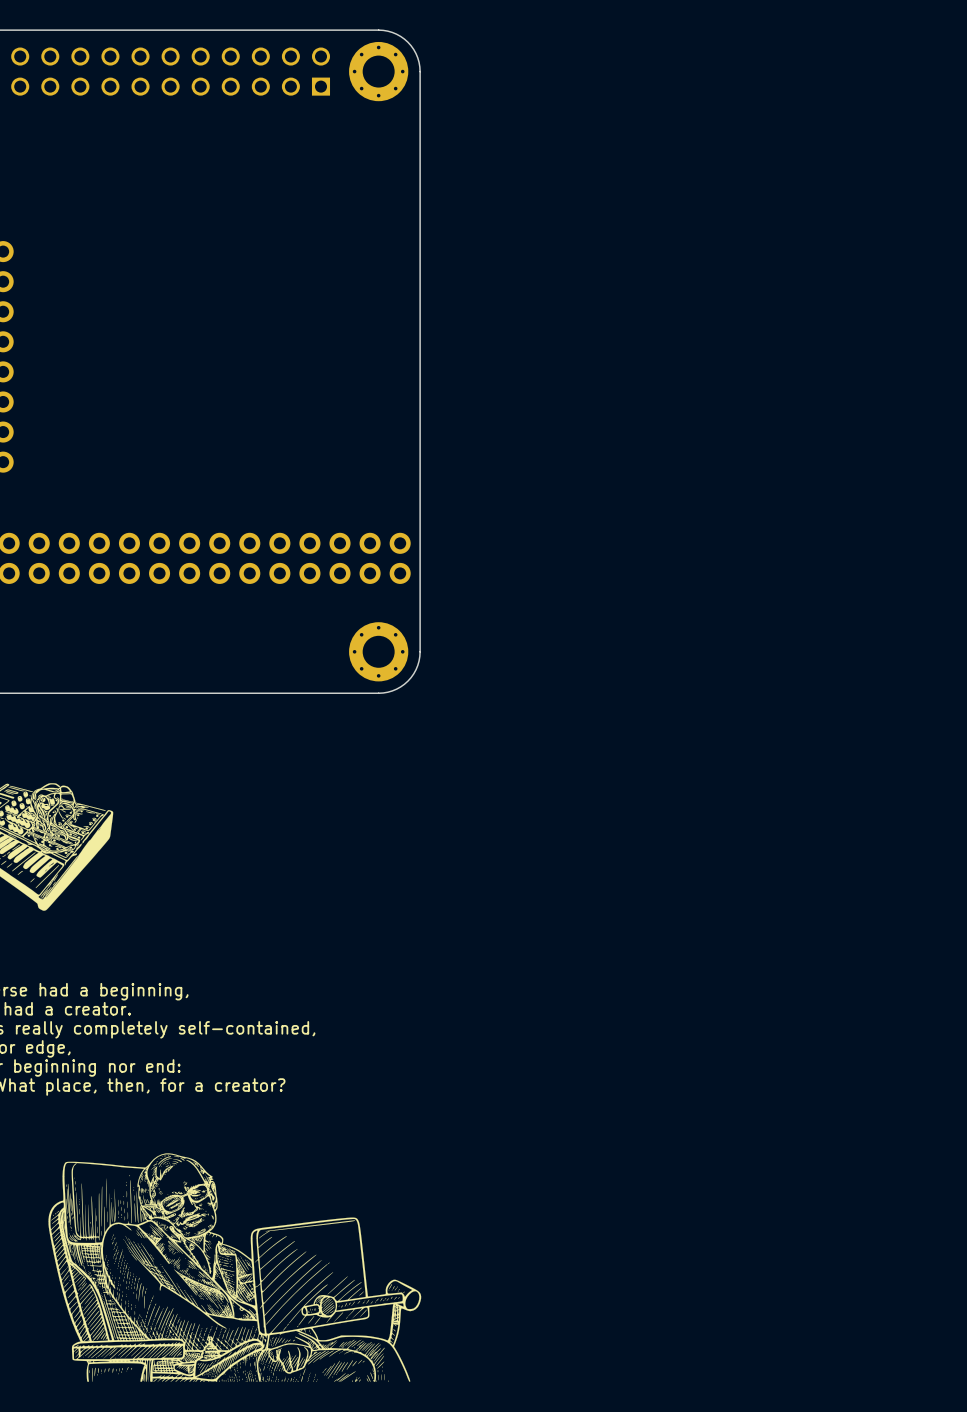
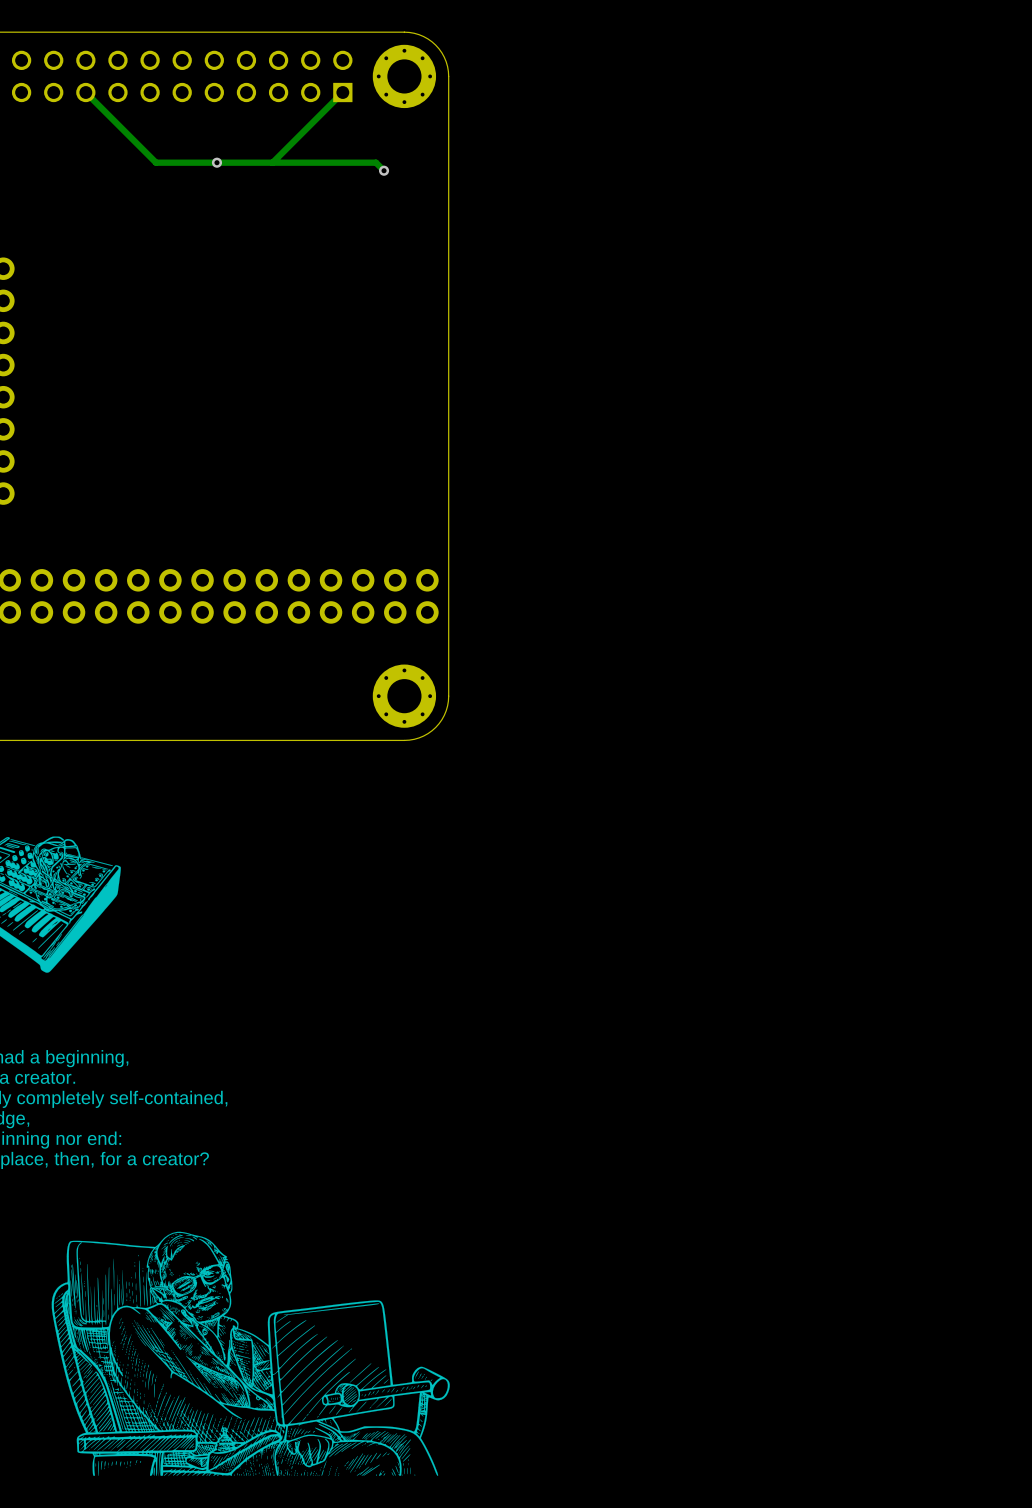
track: none -> (85, 92) (156, 162) (375, 162) (384, 170)
track: none -> (342, 92) (272, 162)
via: none -> (216, 162)
via: none -> (384, 170)

